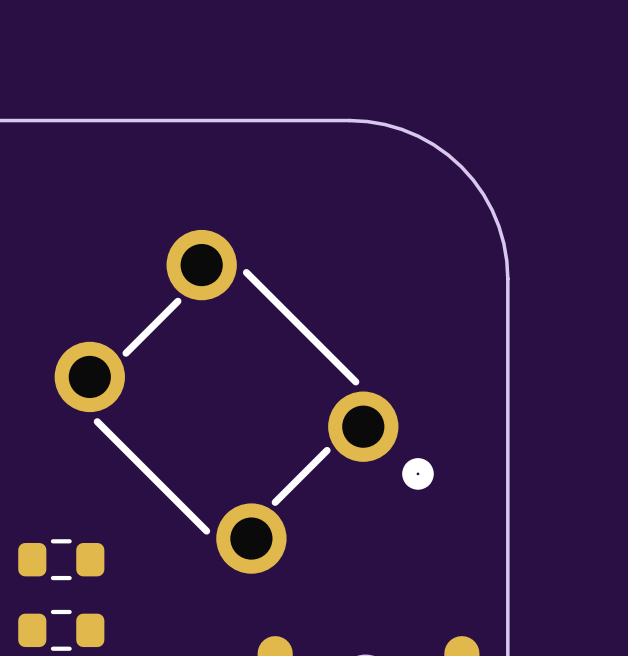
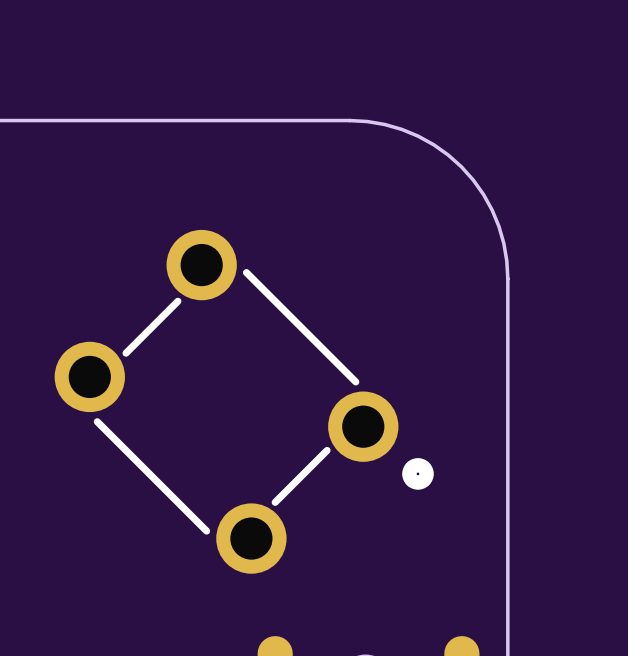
part: (61, 559) -> none
part: (61, 630) -> none

